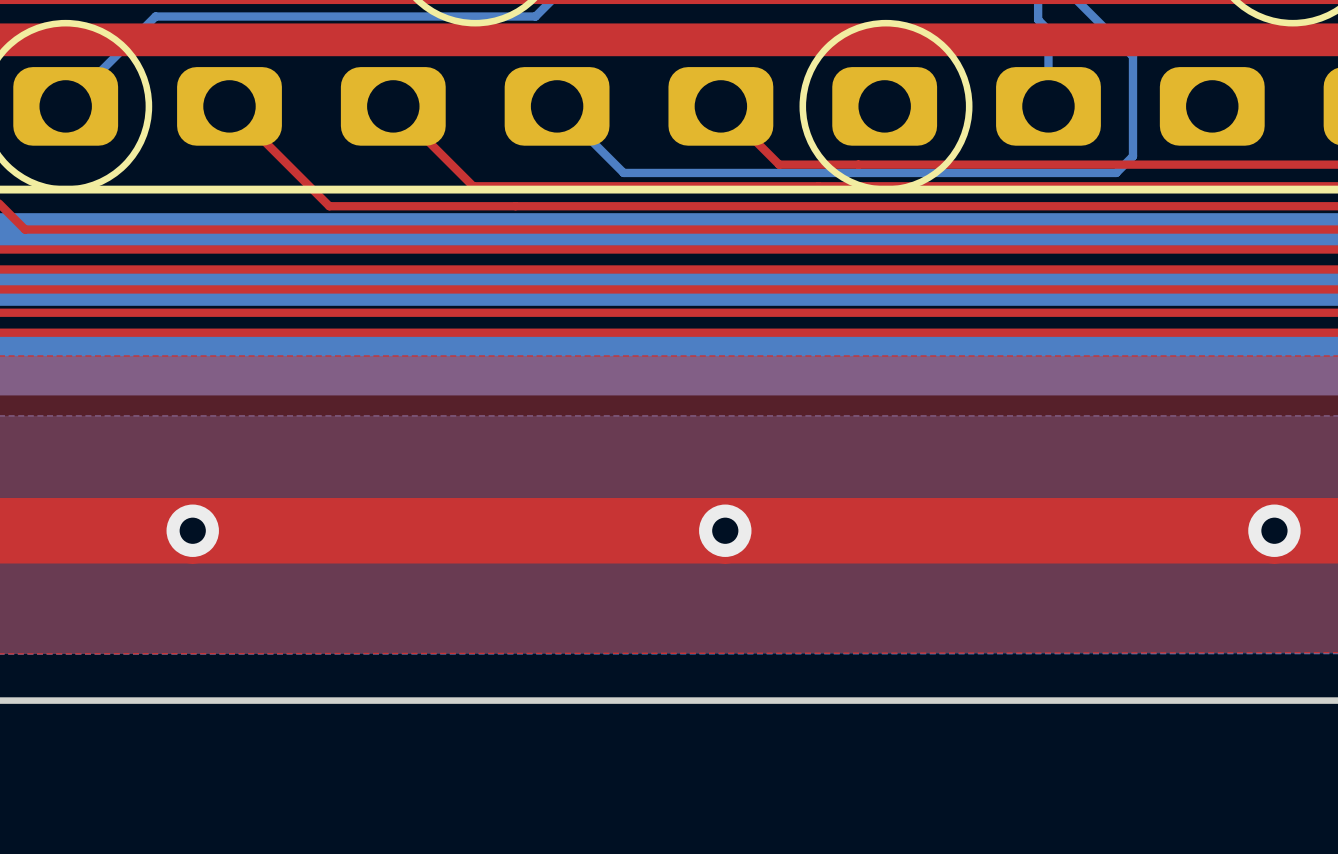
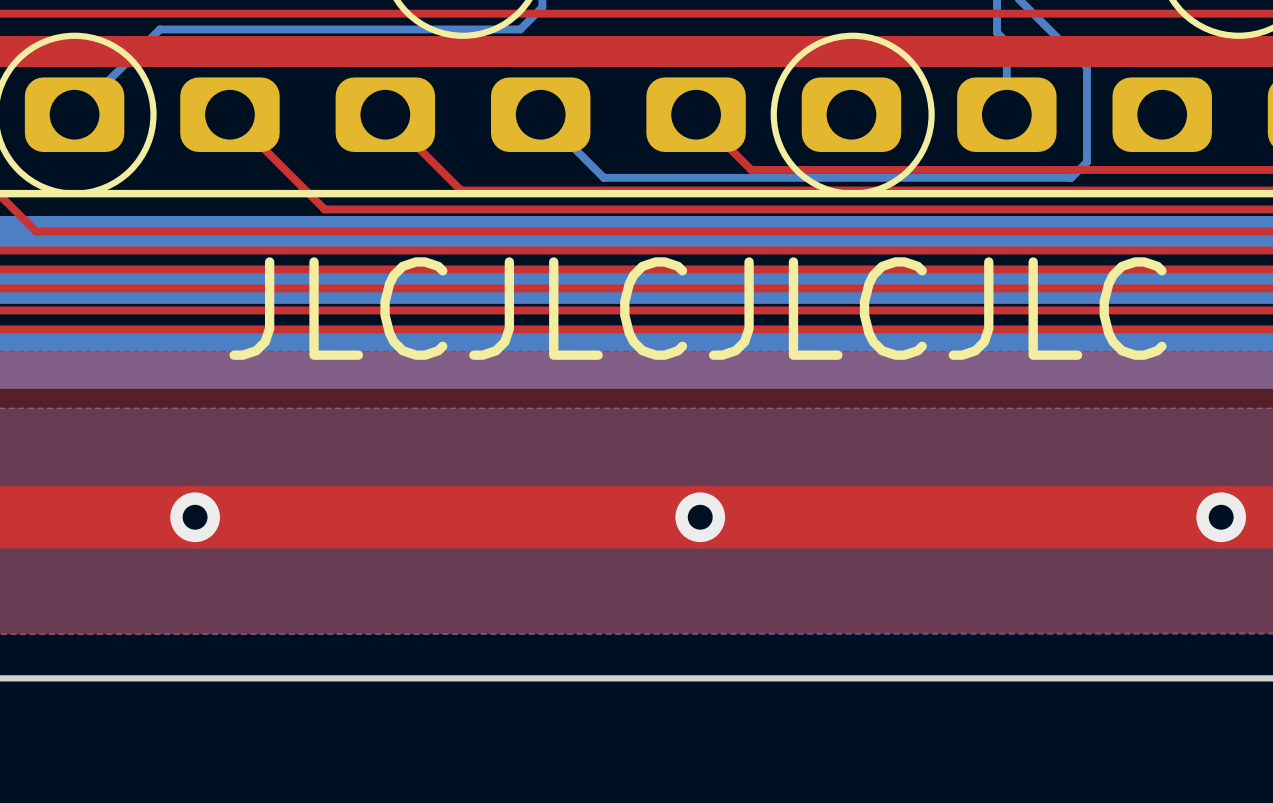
text: none -> JLCJLCJLCJLC (698, 308)

